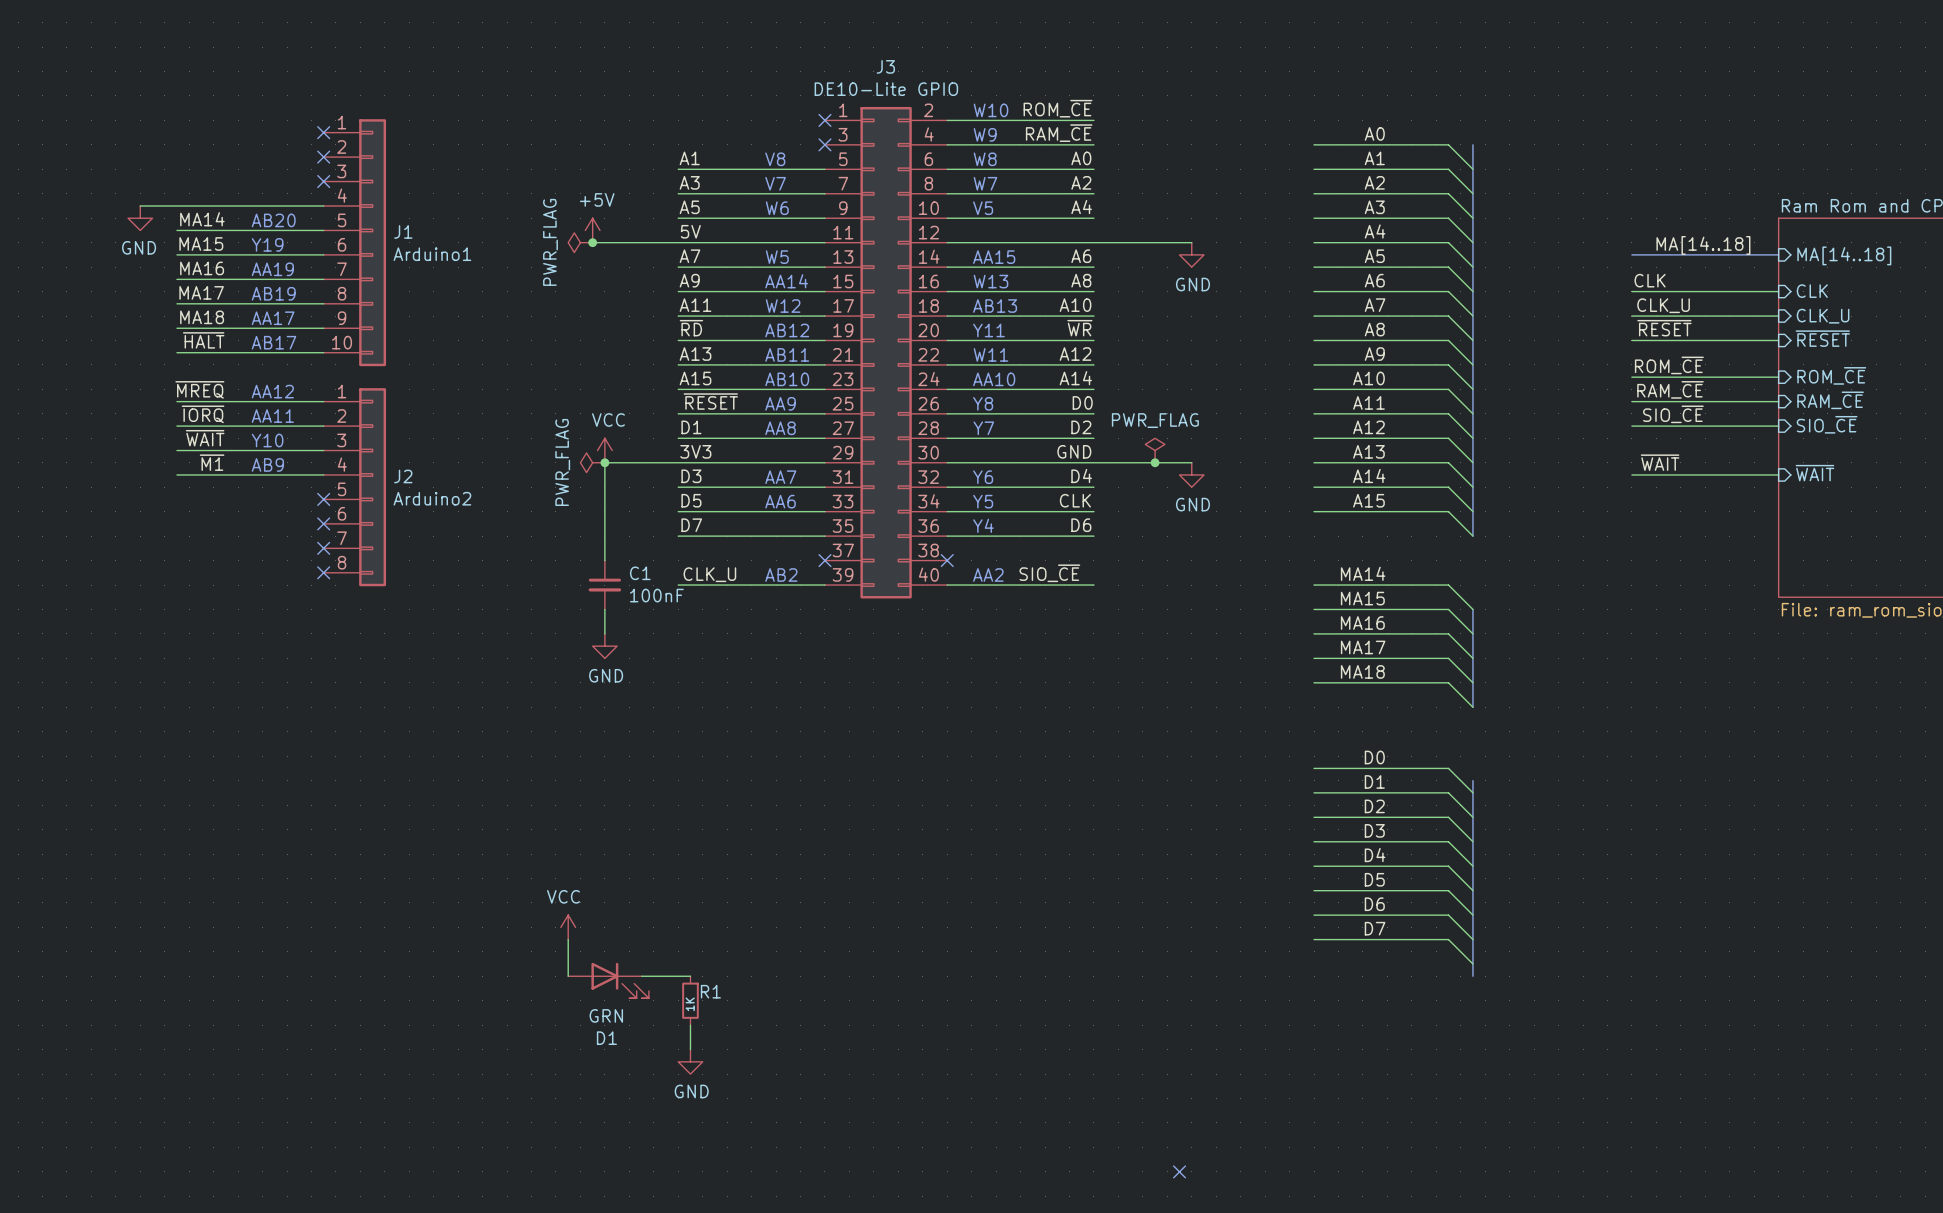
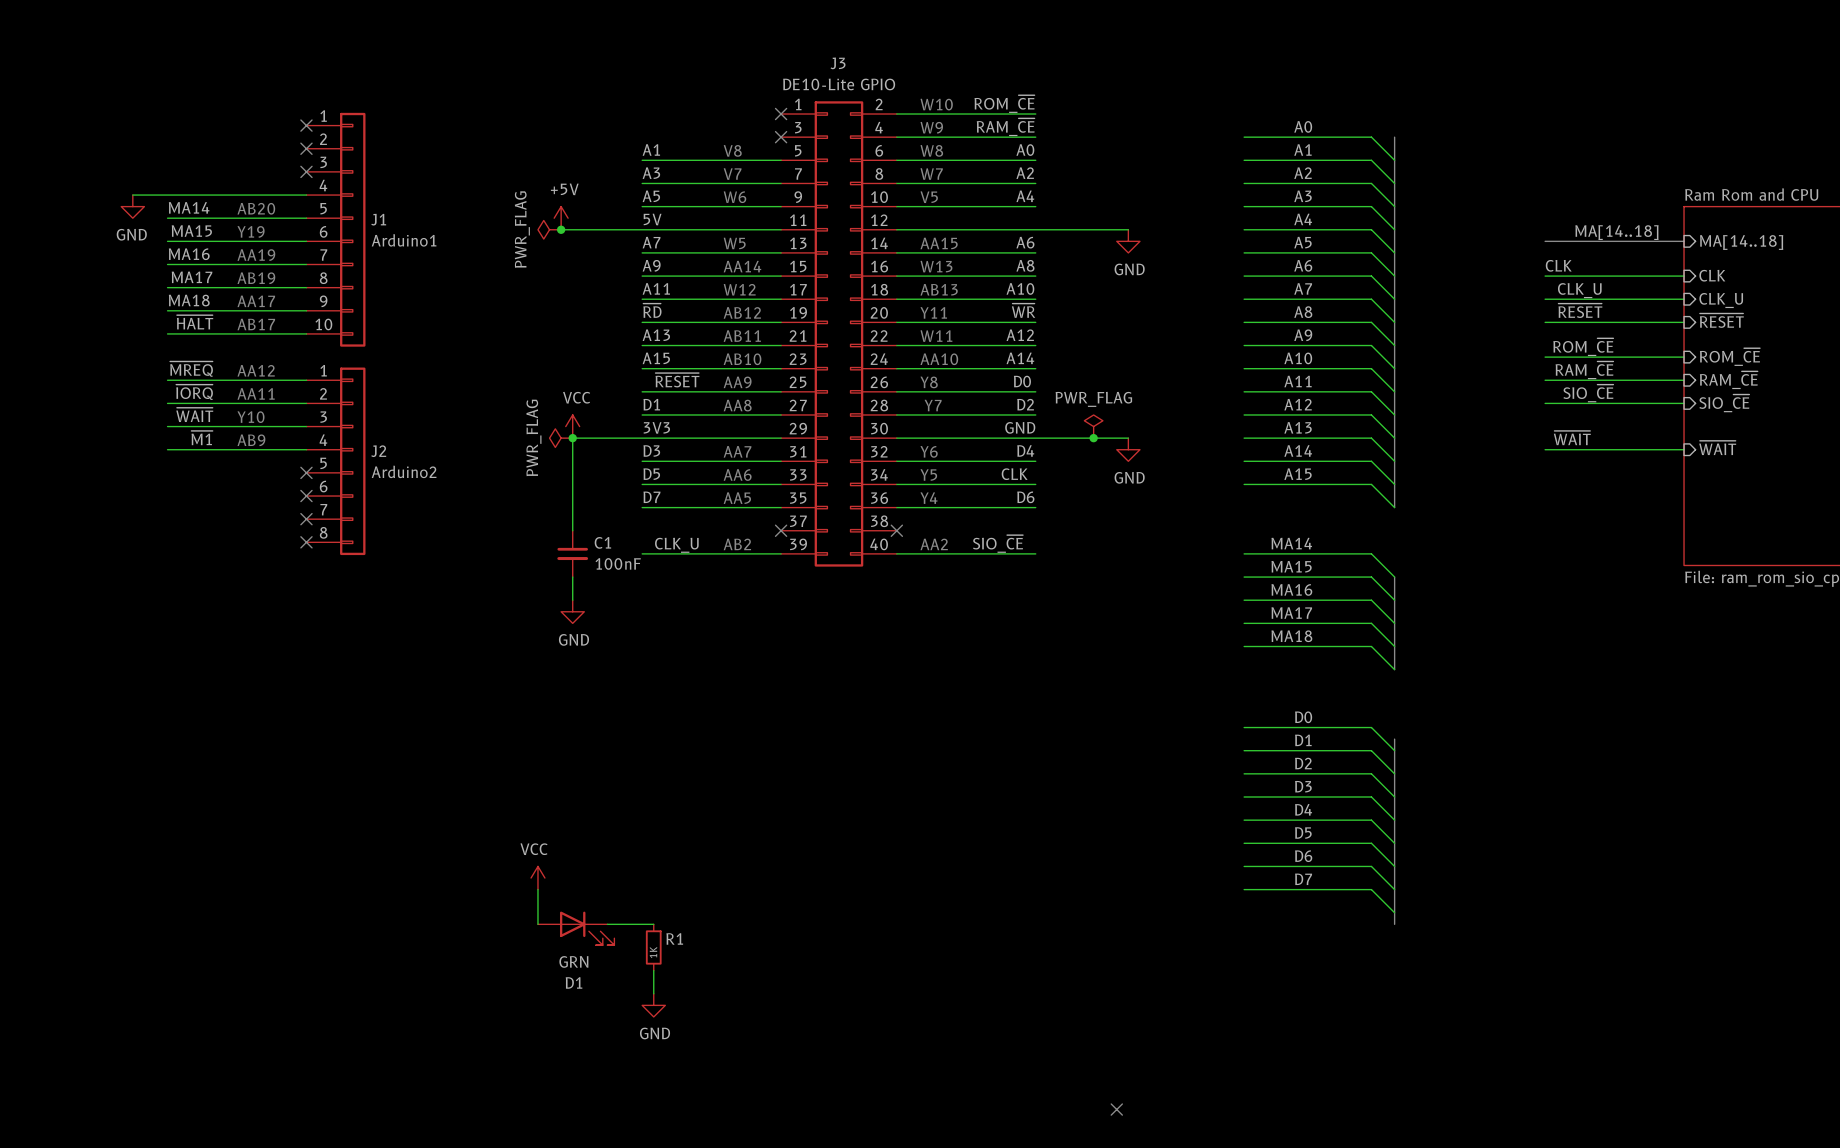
text: none -> AA5 (737, 498)

